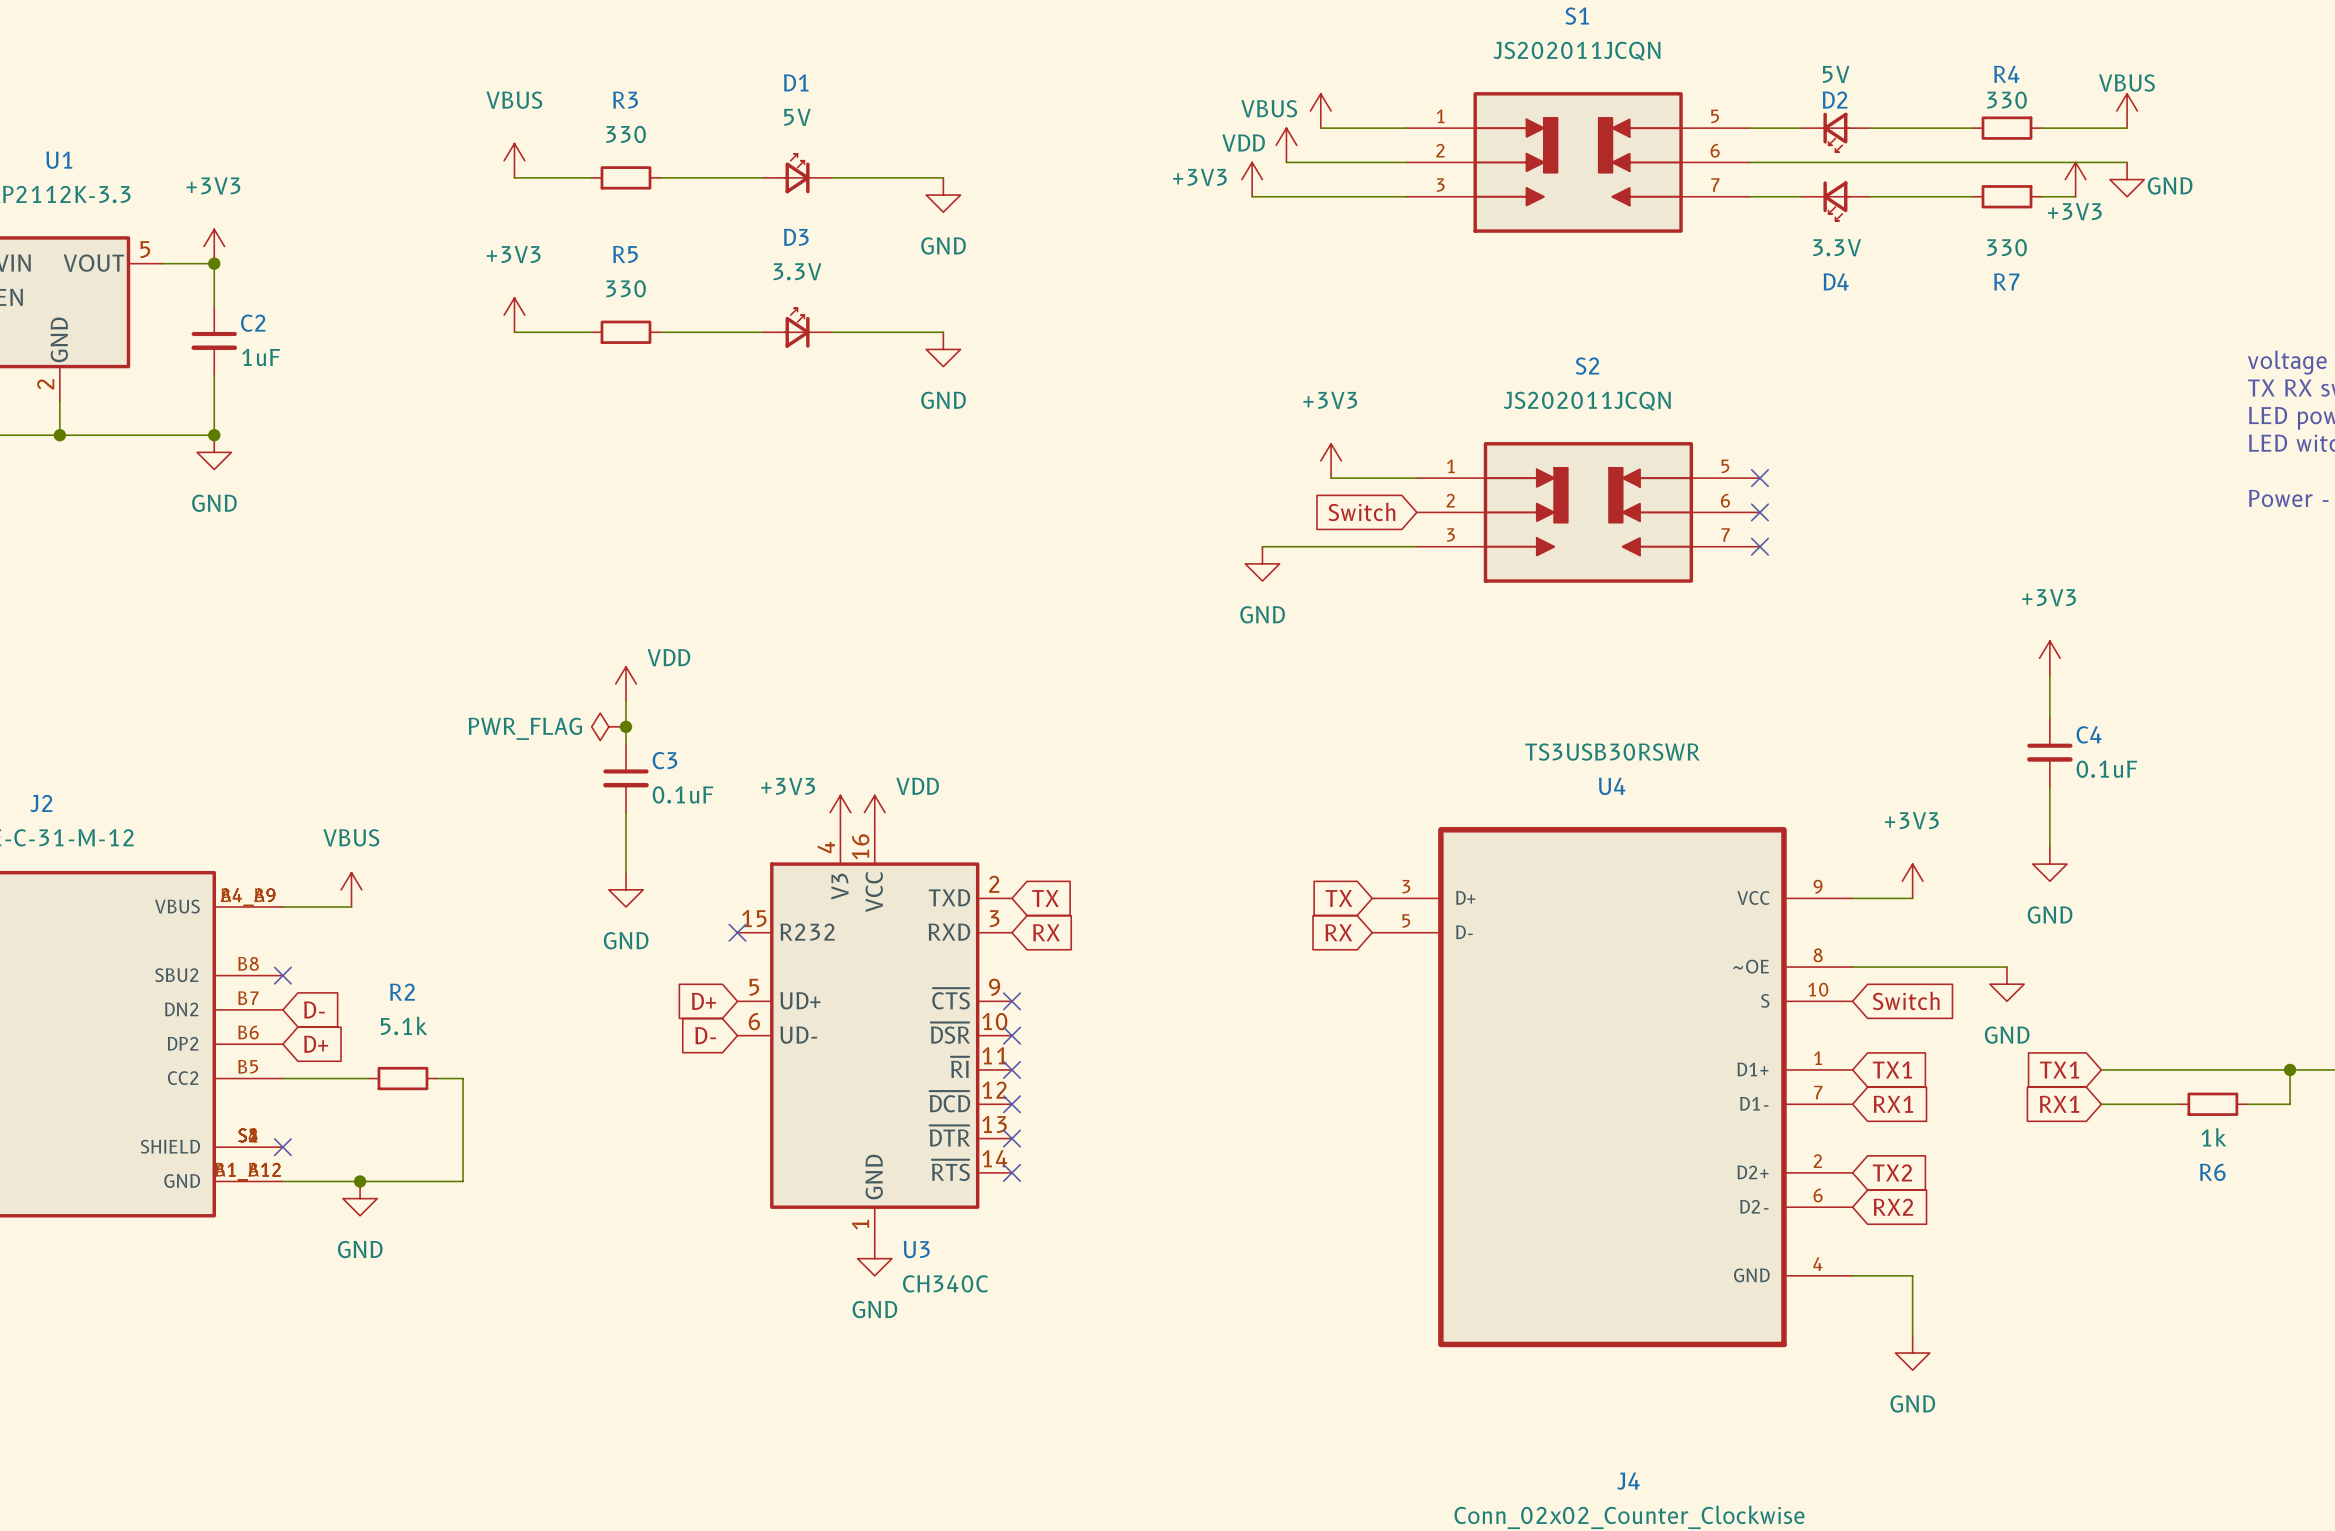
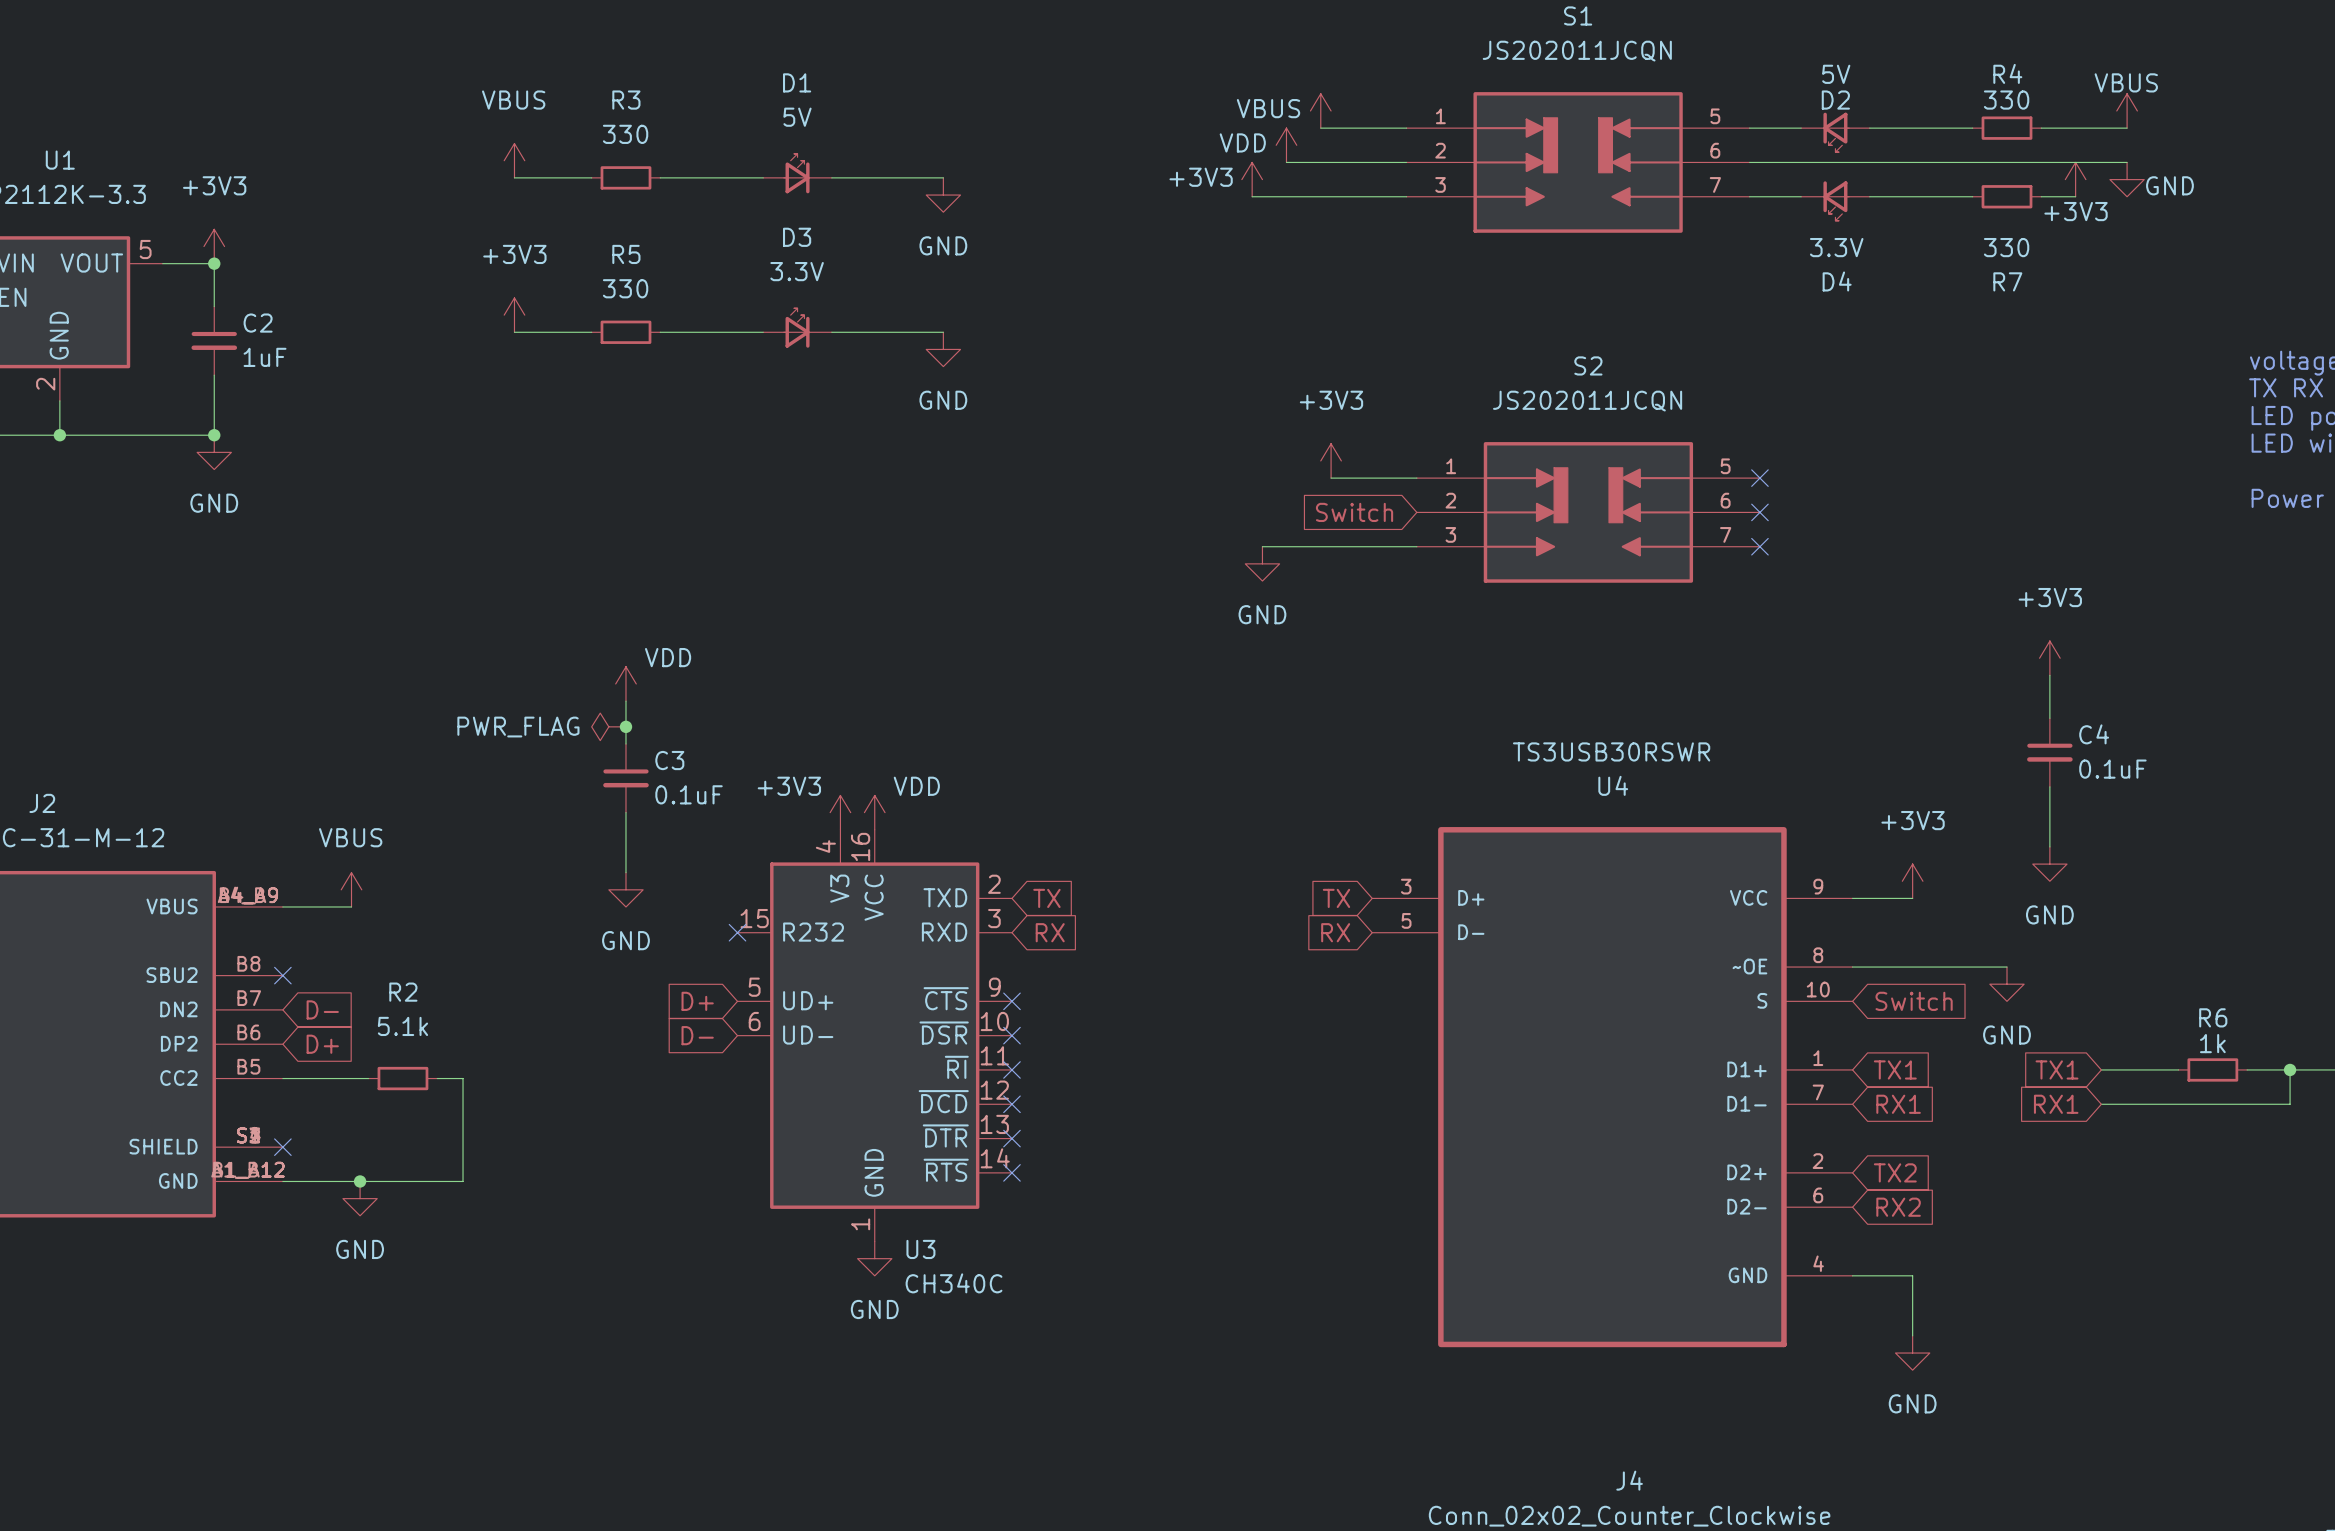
wire: (2178, 1069) (2247, 1069) -> (2178, 1104) (2247, 1104)
R6 position: (2212, 1104) -> (2212, 1069)
R6 value position: 1k (2213, 1137) -> 1k (2212, 1043)
R6 name position: R6 (2212, 1172) -> R6 (2213, 1017)

